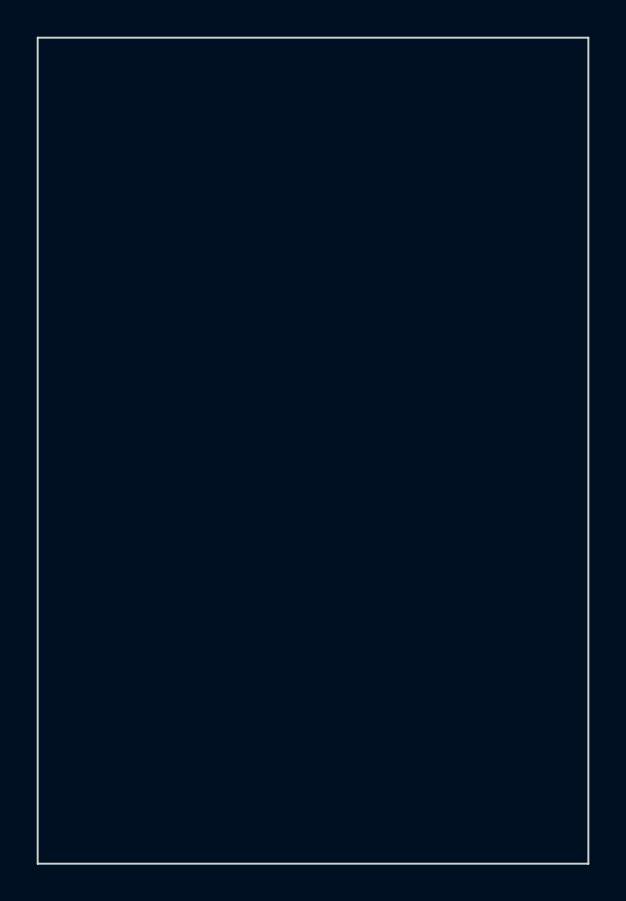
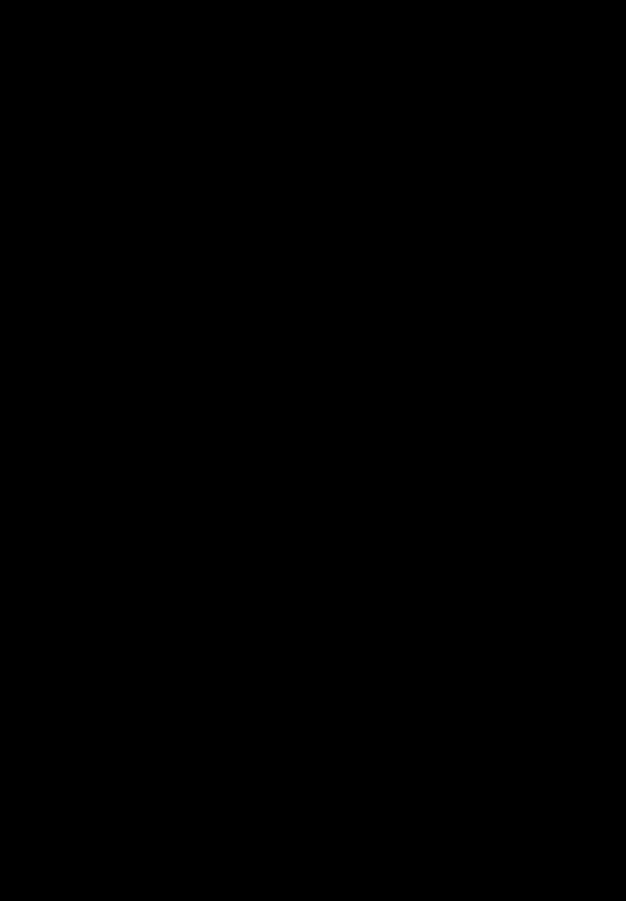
board edge: (588, 37) (588, 863) (37, 863) (37, 37) (588, 37) -> none

